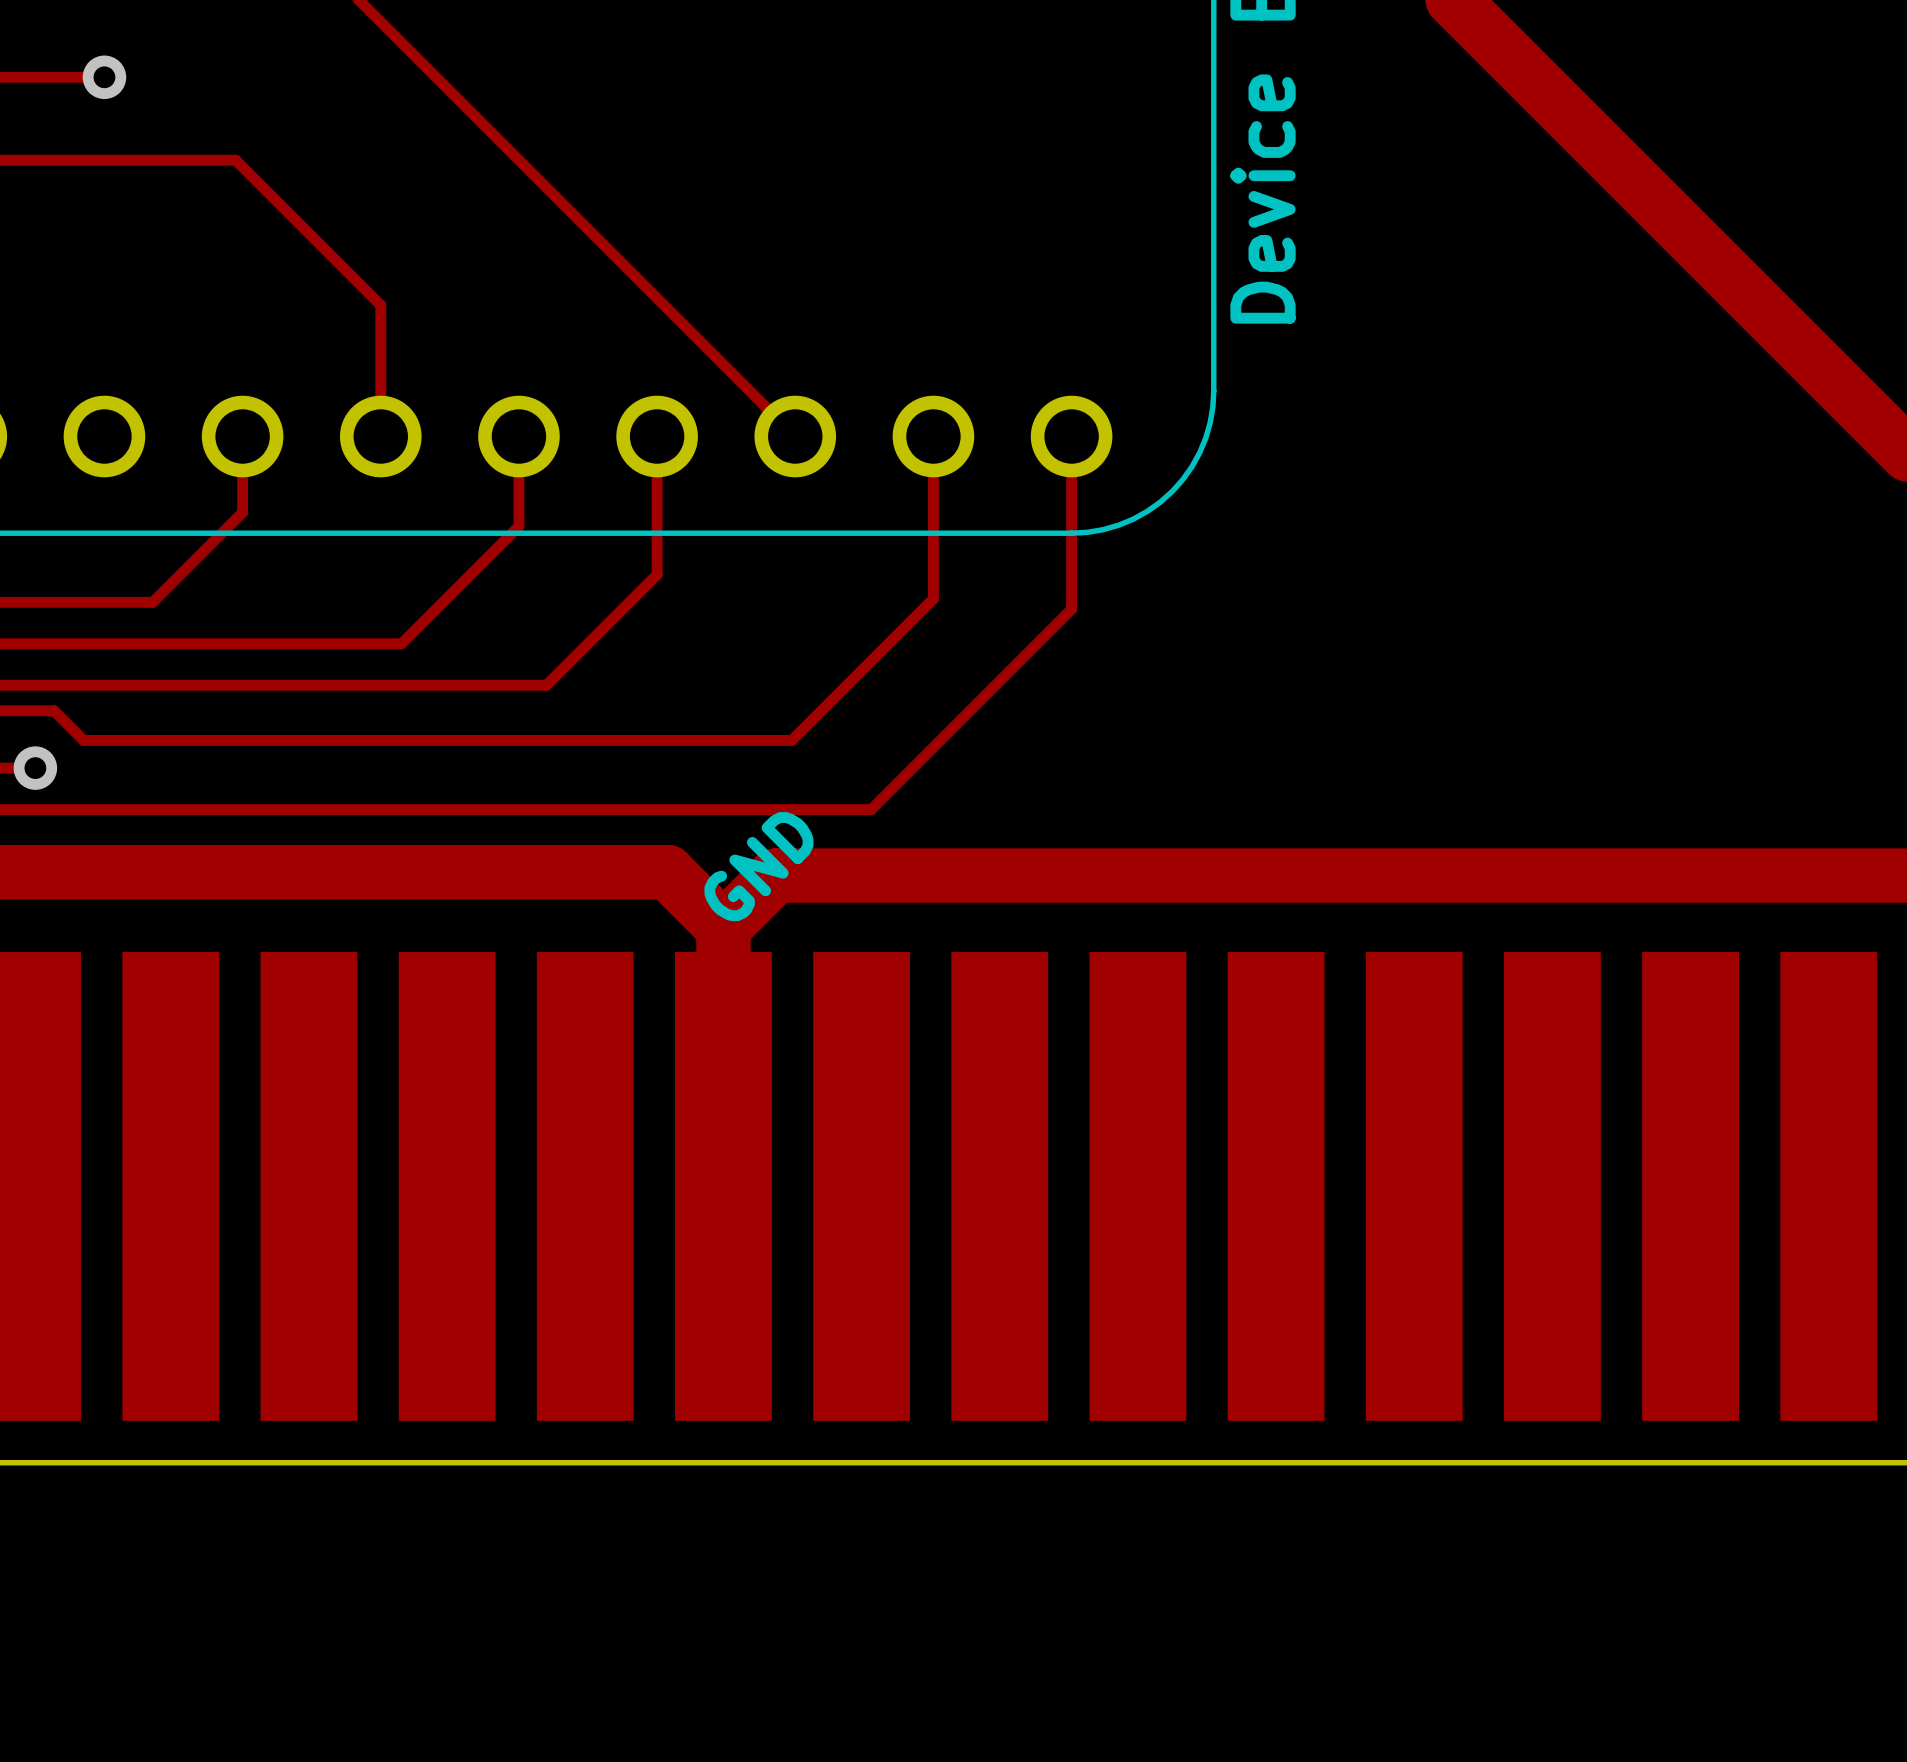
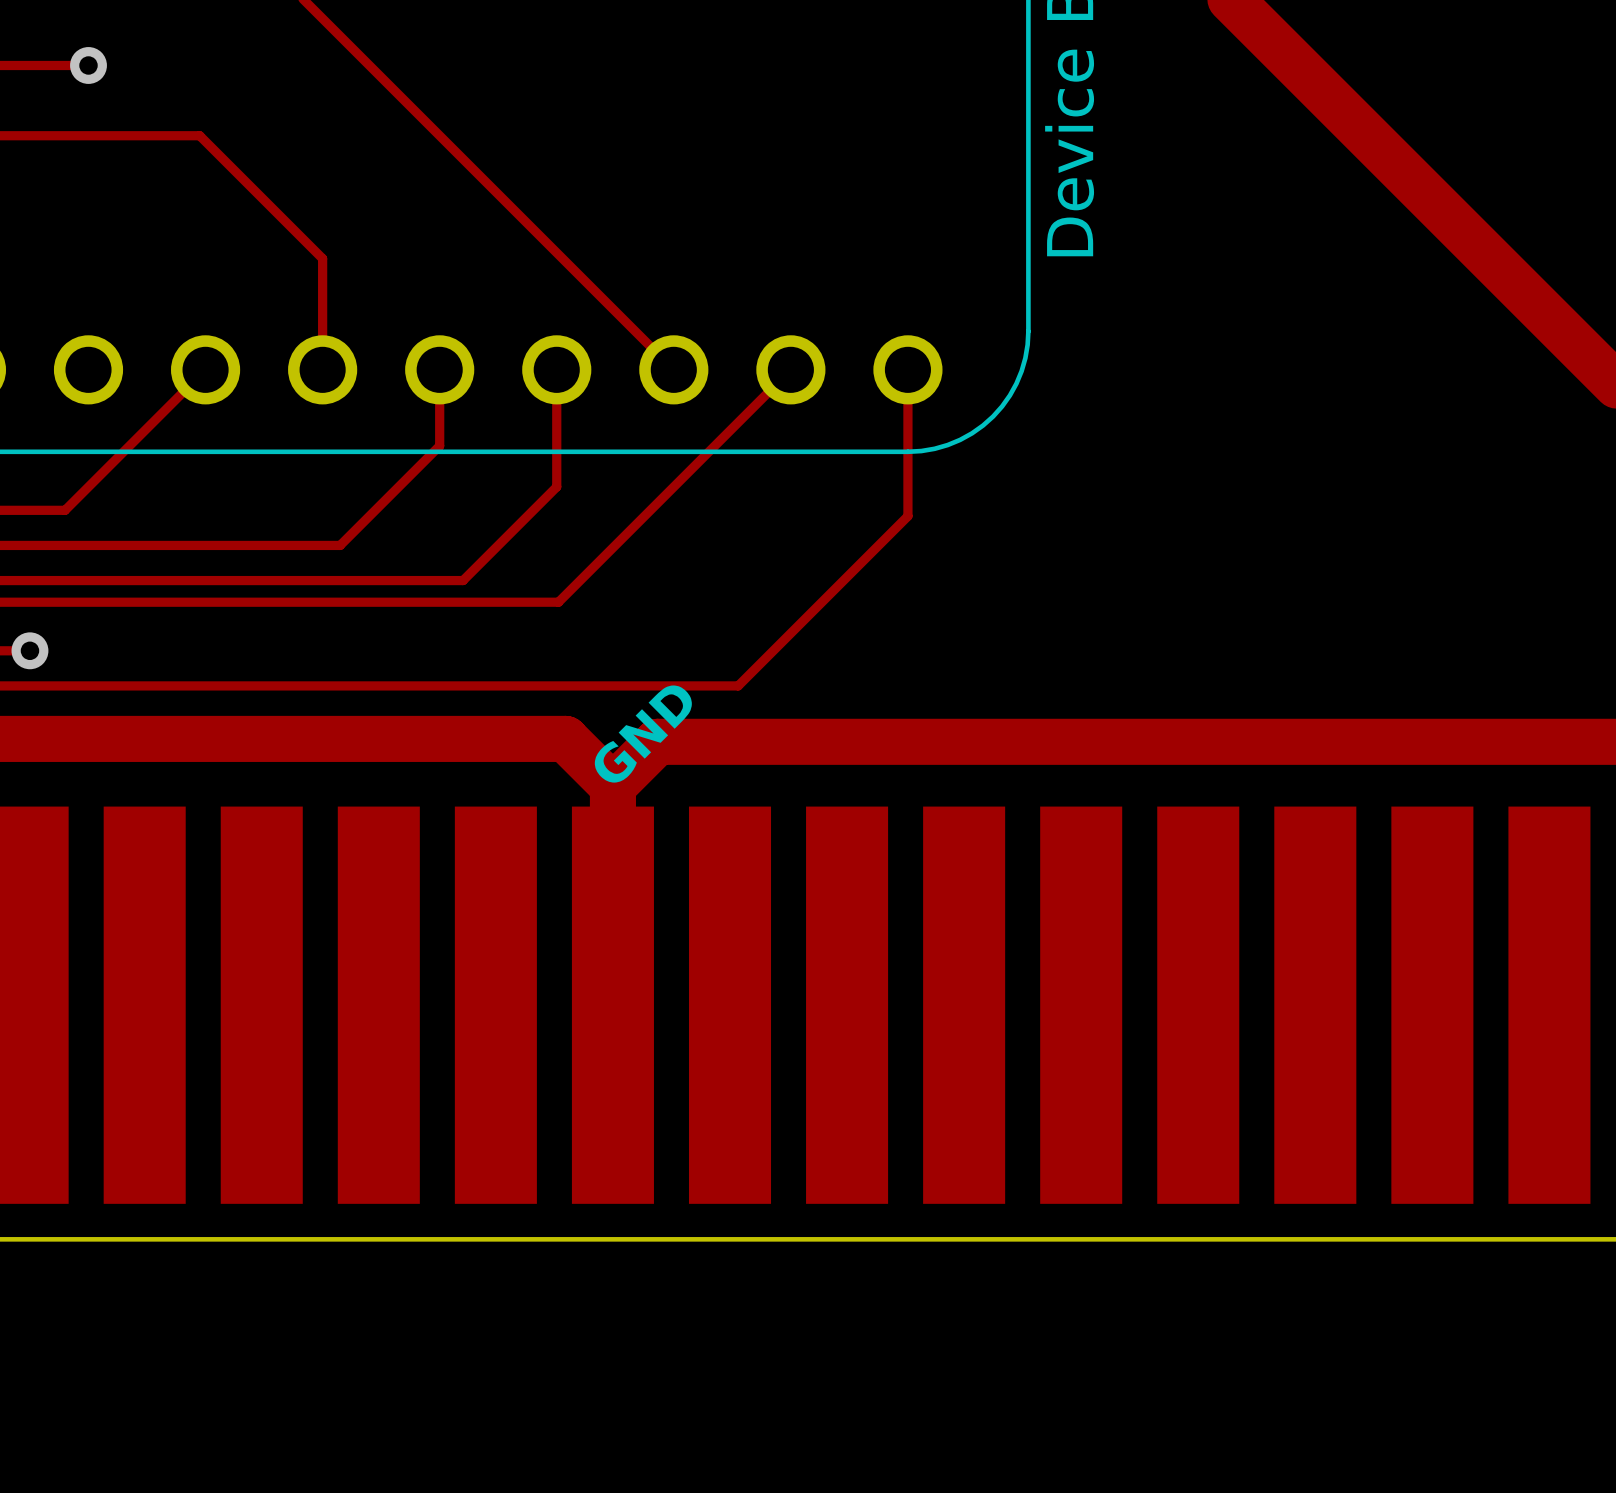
track: (242, 436) (242, 512) (152, 602) (76, 602) -> (205, 369) (65, 510)
track: (933, 436) (933, 598) (791, 740) (83, 740) (54, 710) -> (790, 369) (558, 602) (45, 602)

